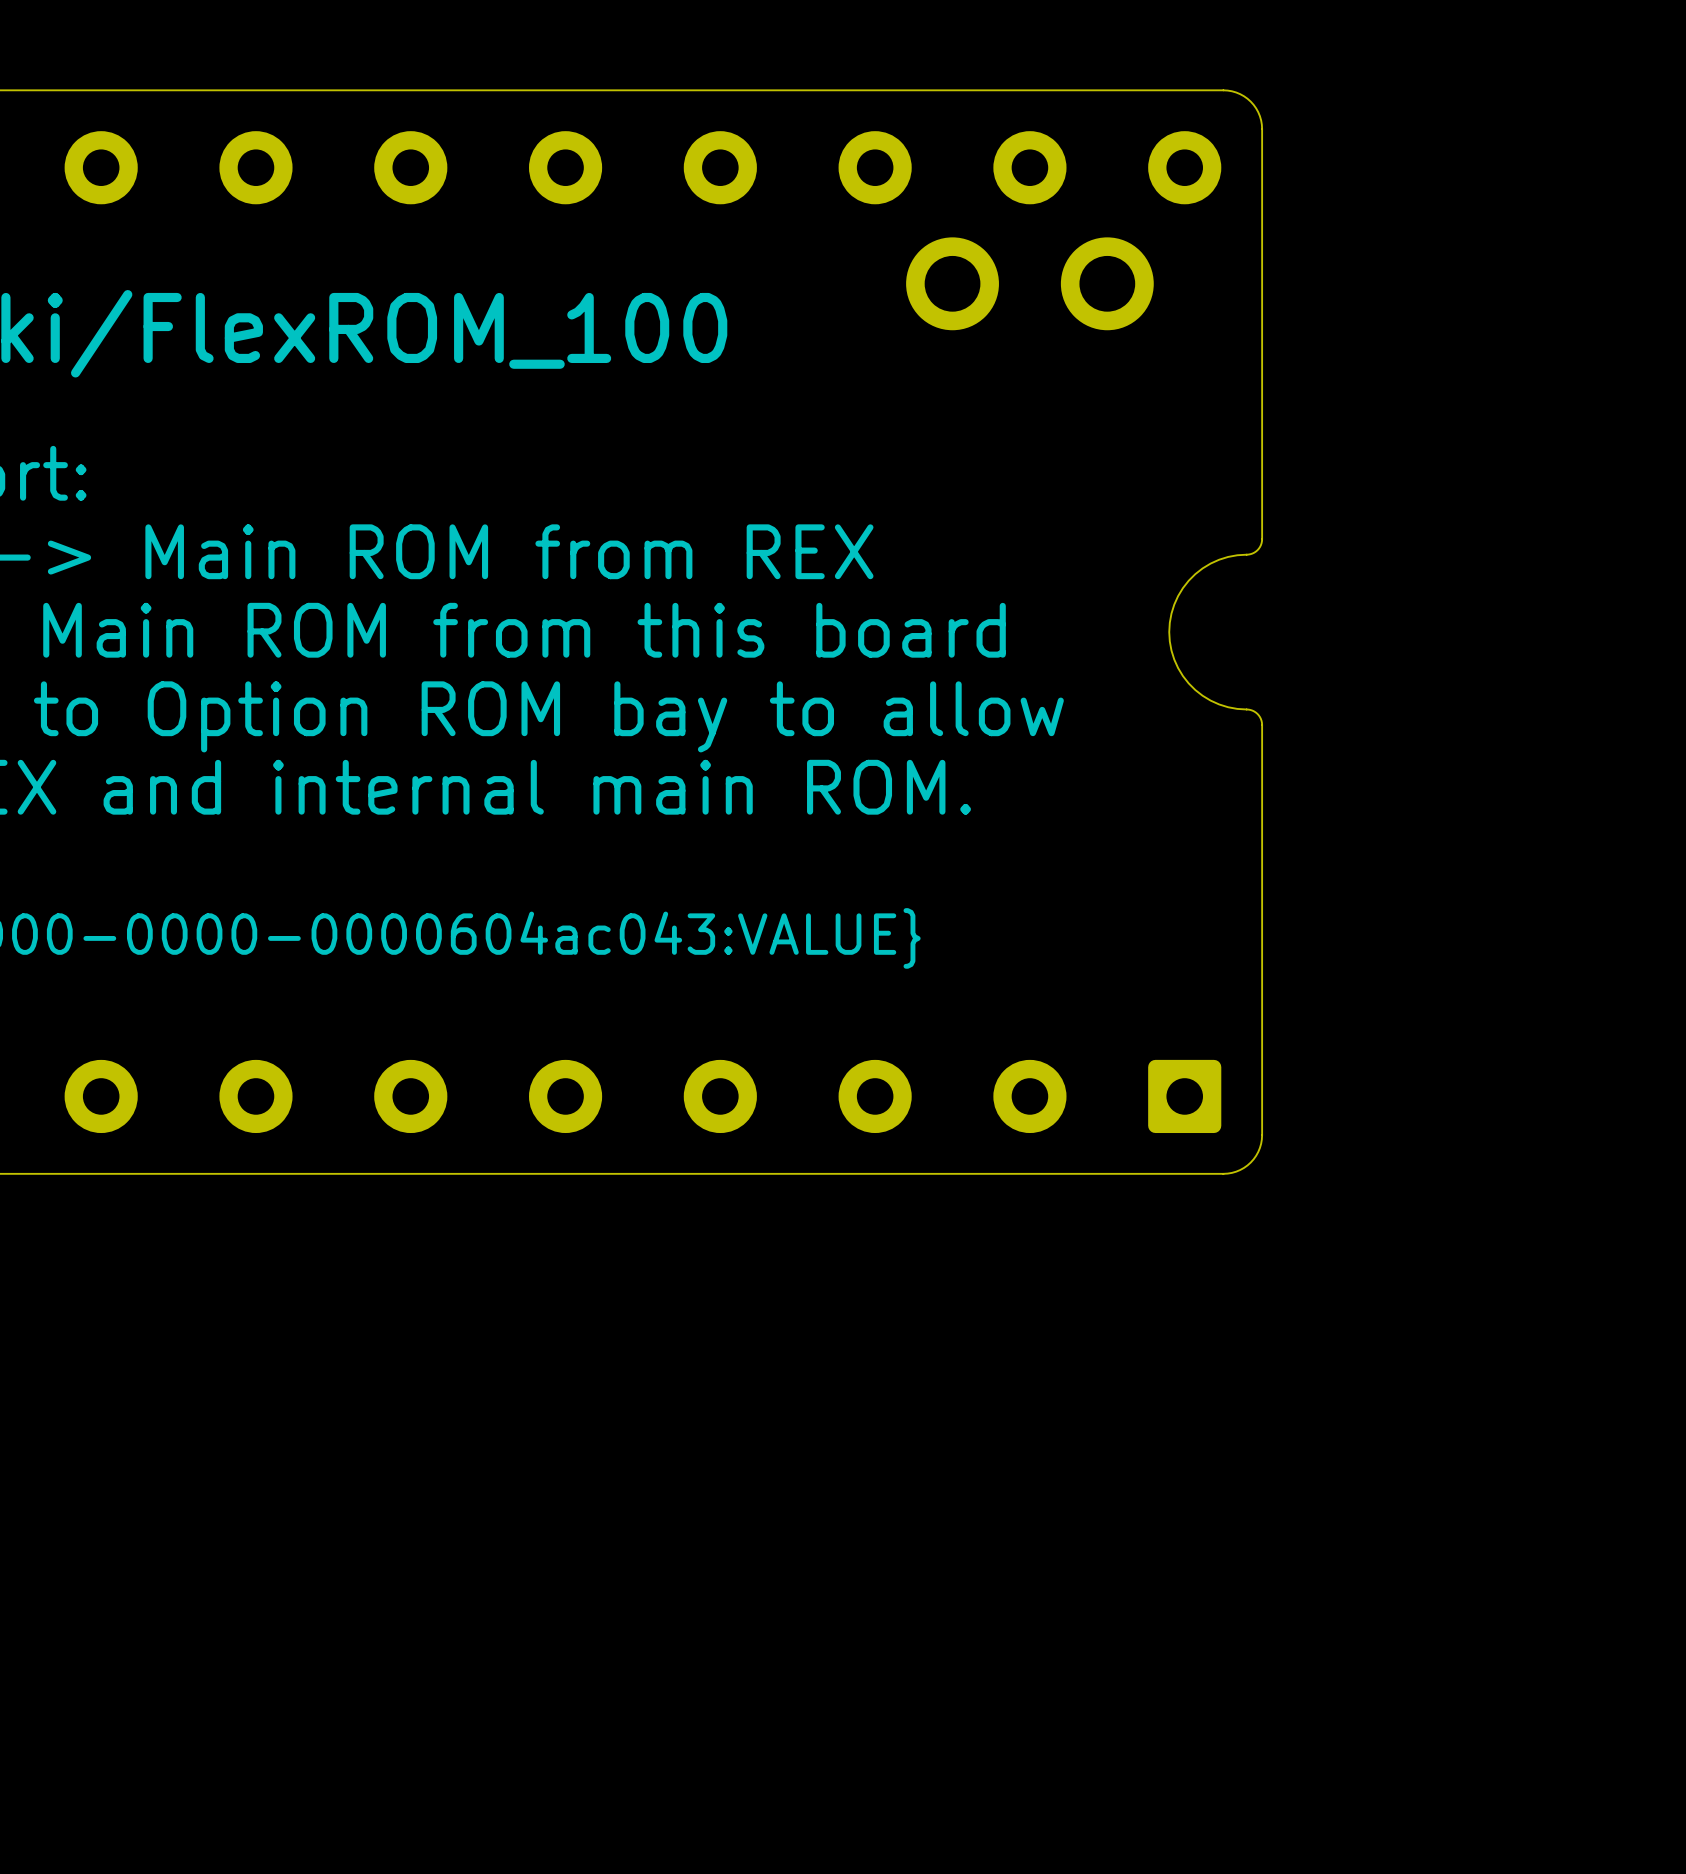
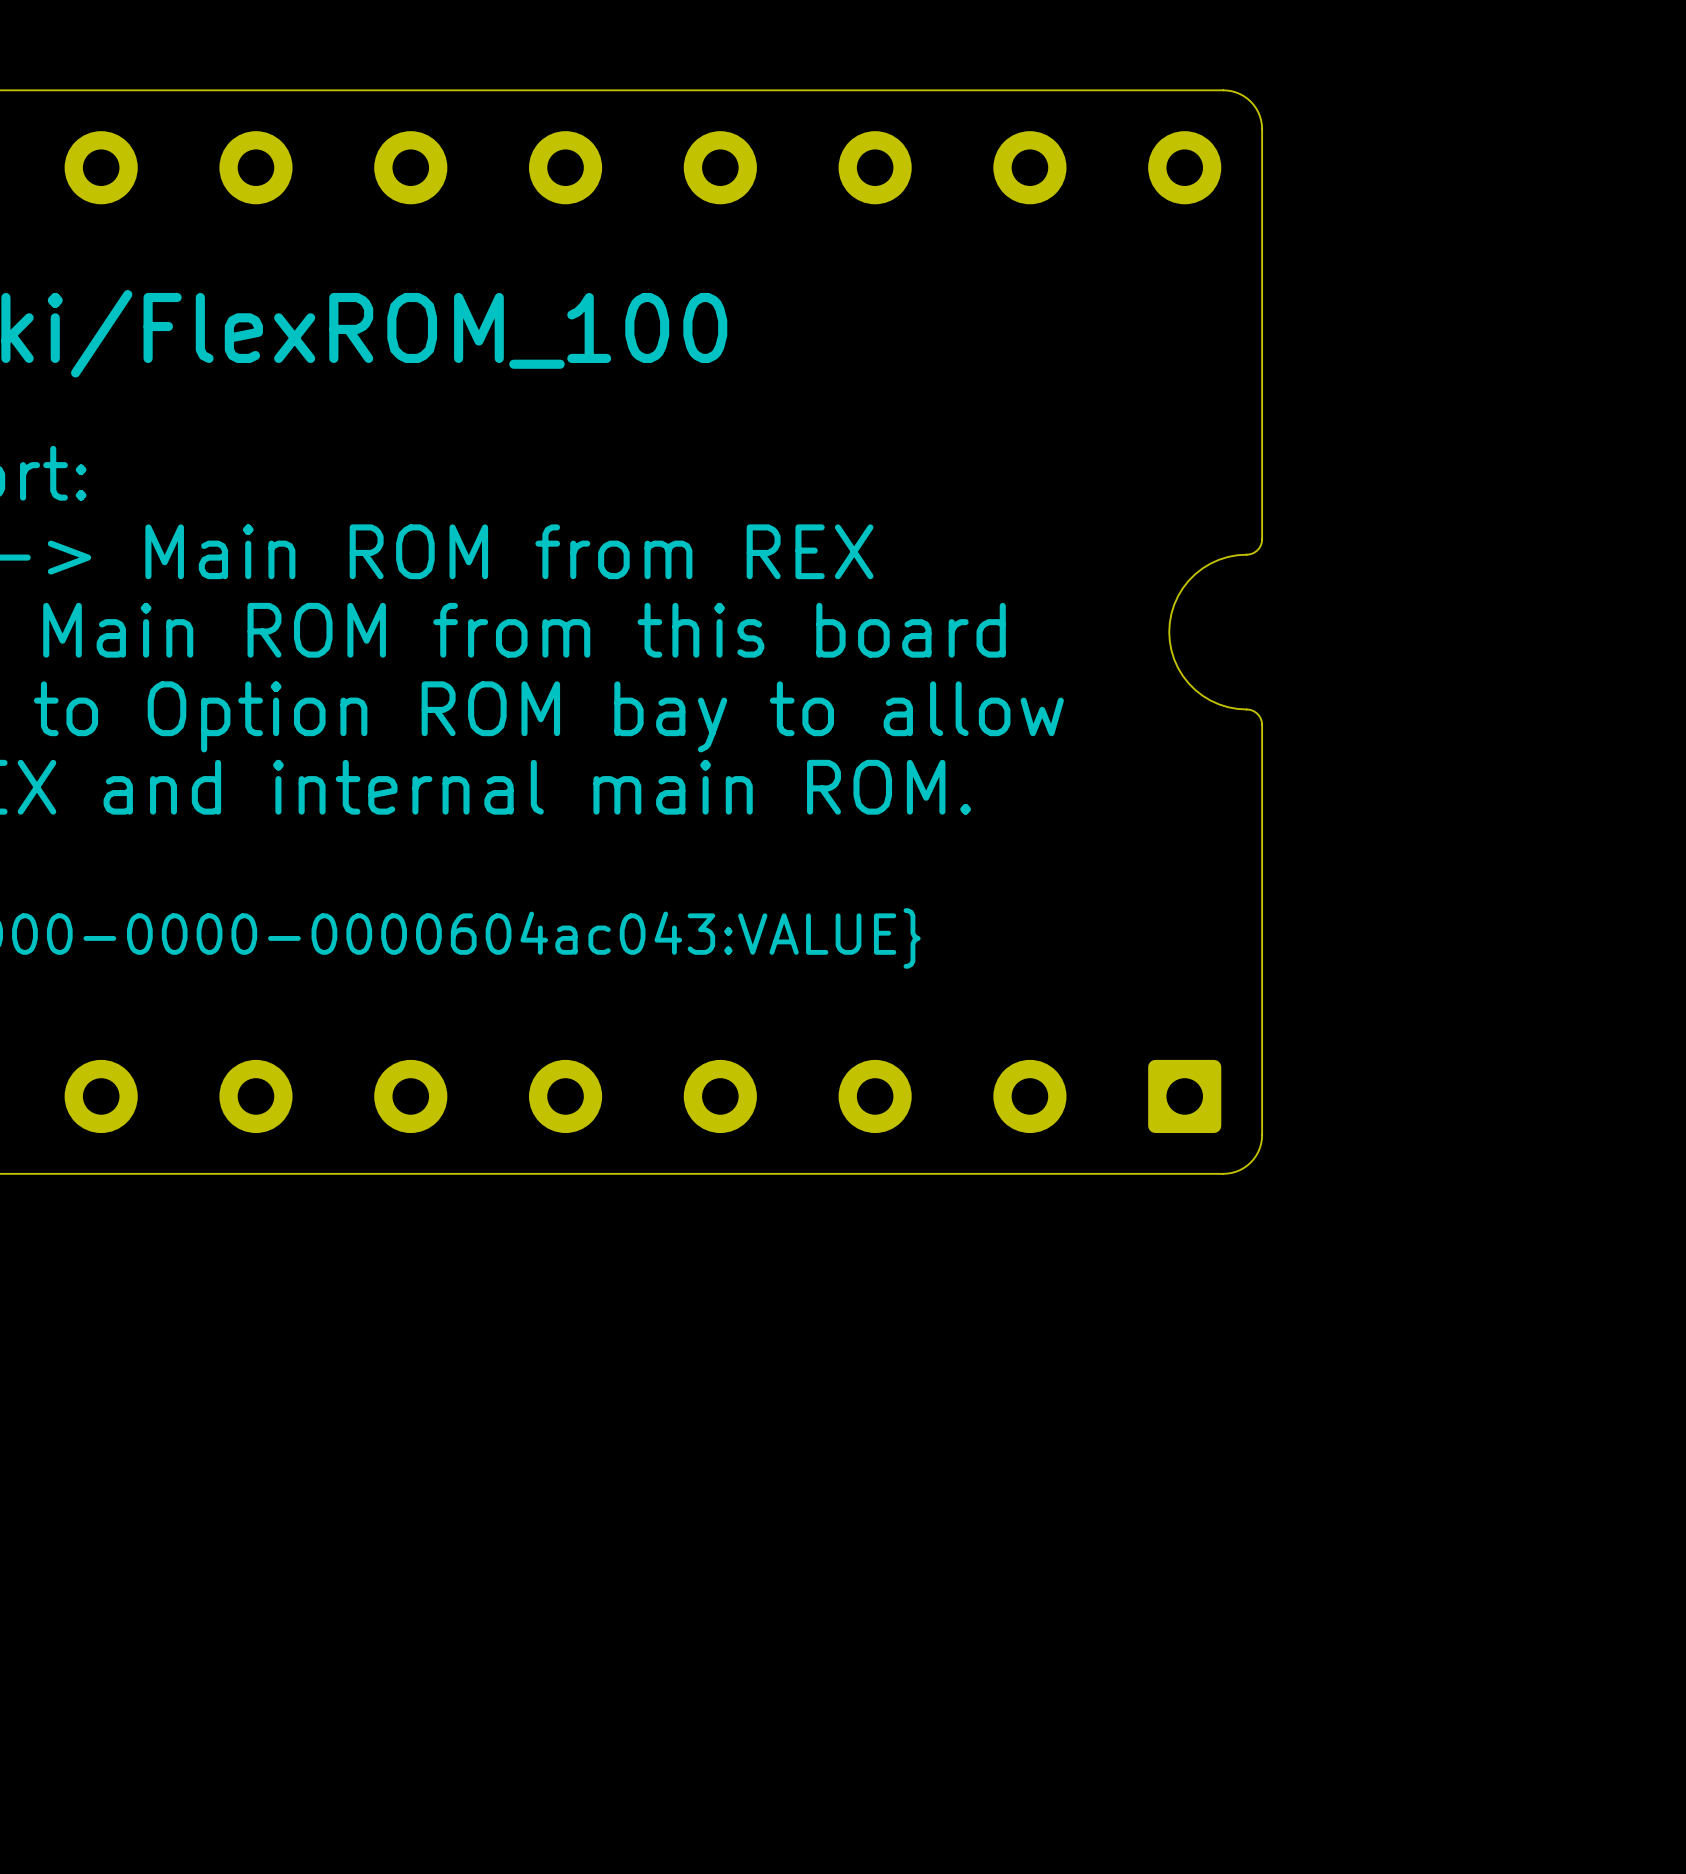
part: (1029, 283) -> none

